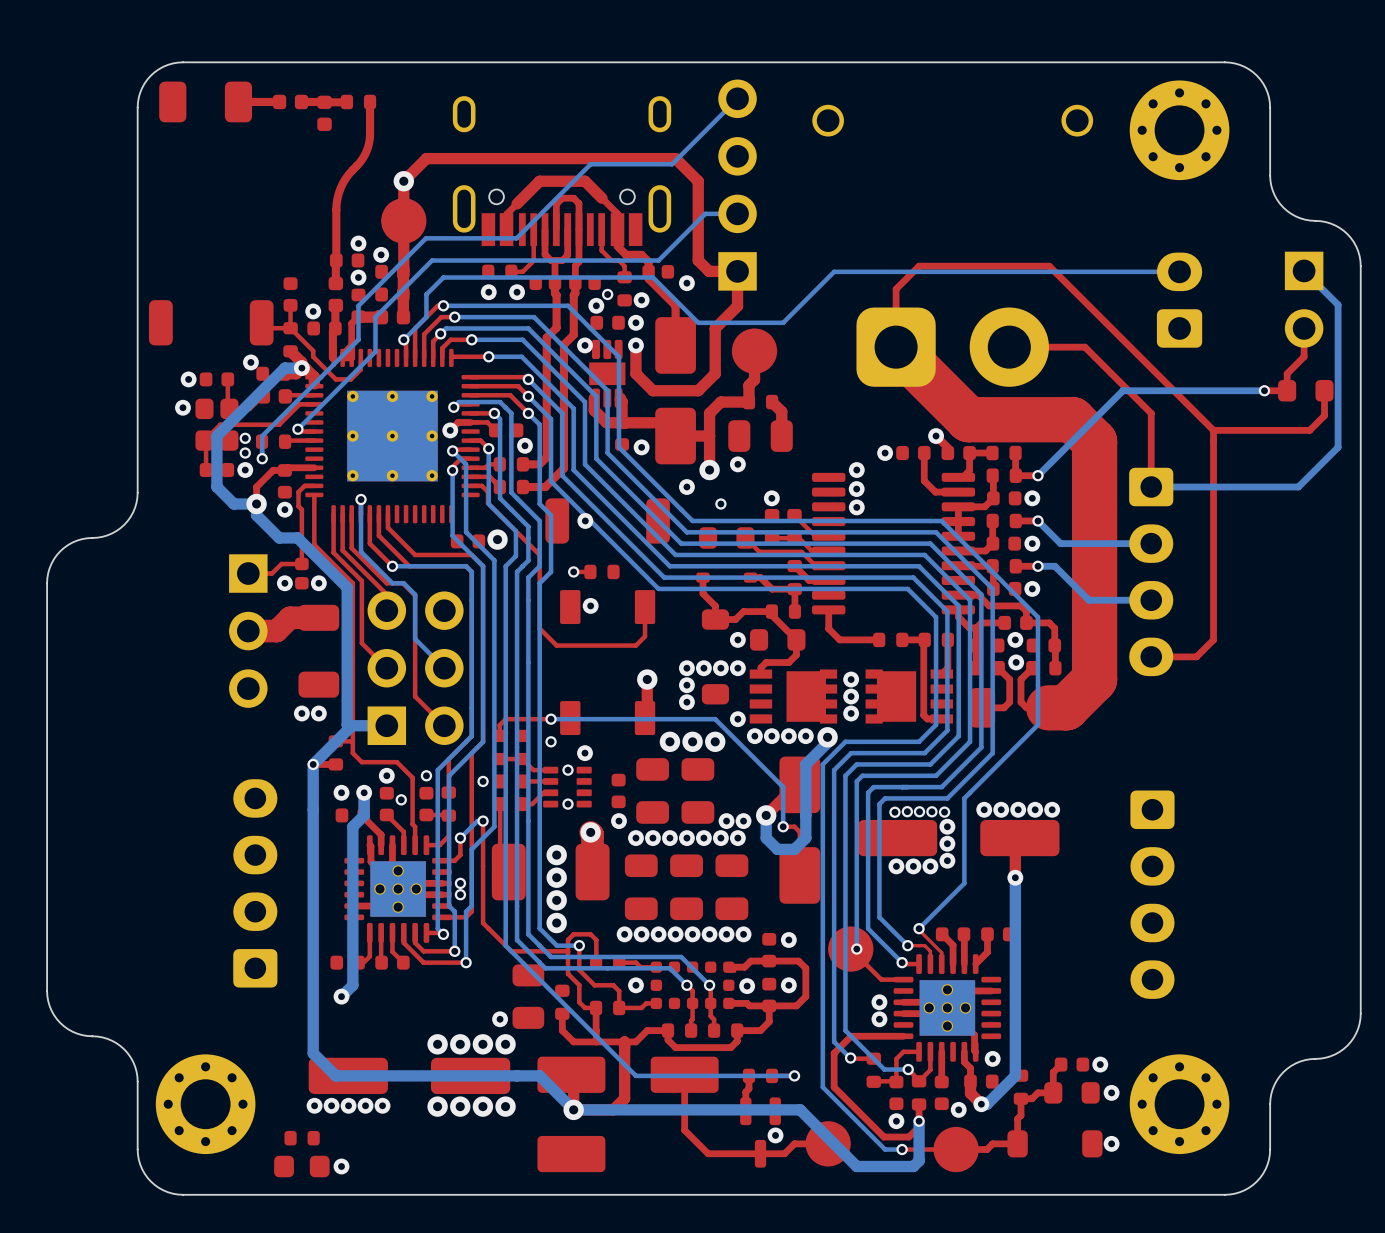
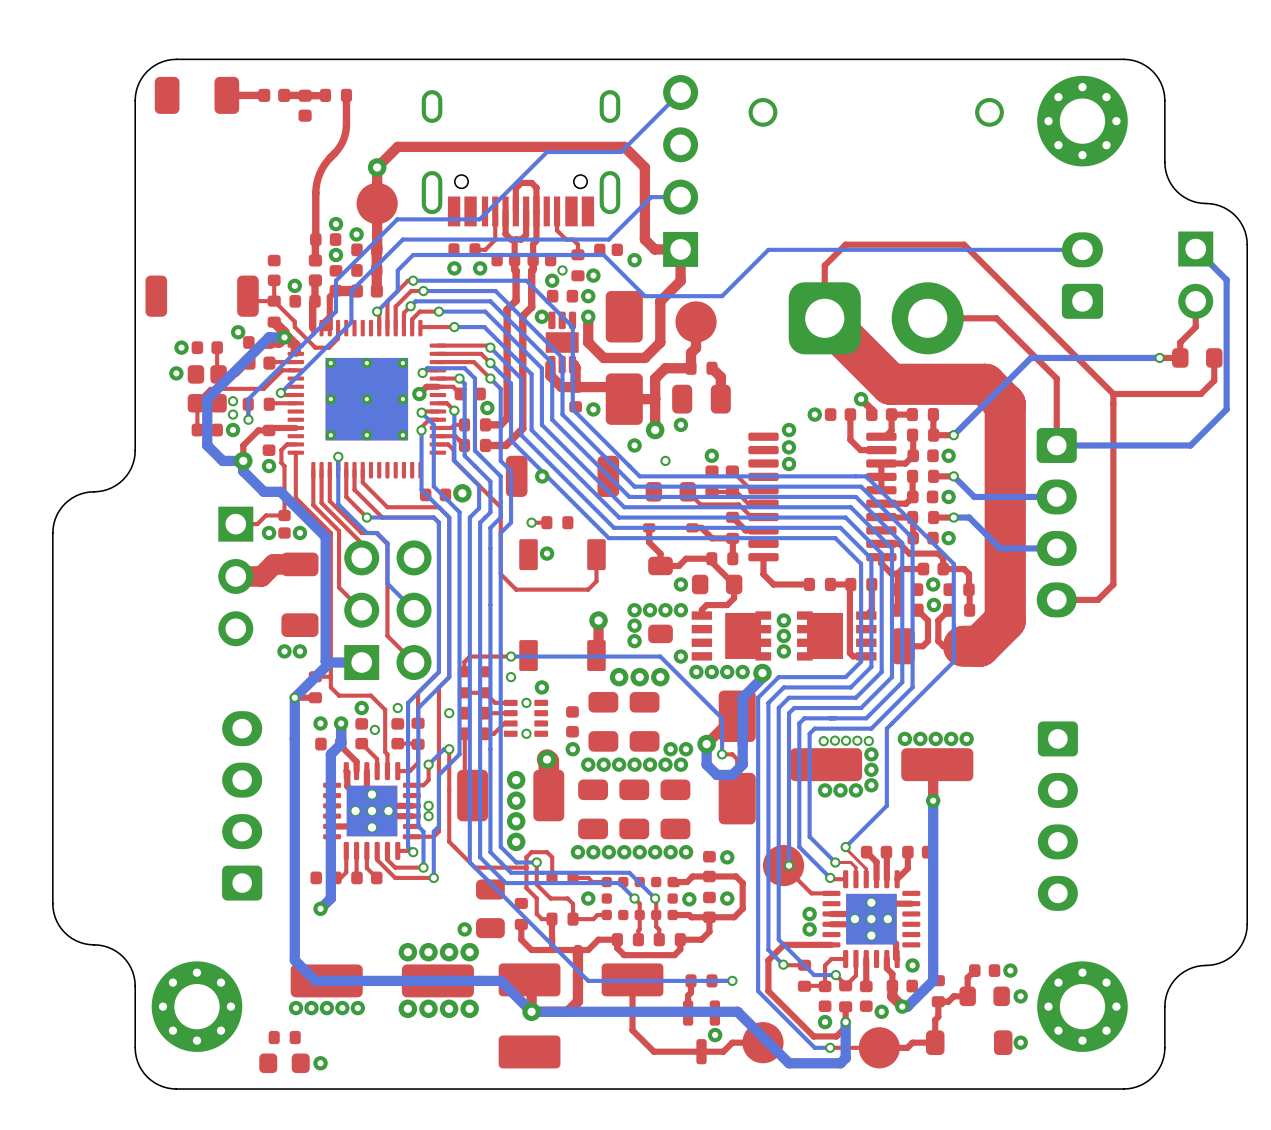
top track: (506, 229) (506, 214) (539, 181) (585, 181) (617, 213) (617, 246) (626, 254) (641, 254) (648, 261) (648, 278) (675, 305) (675, 345) -> none

